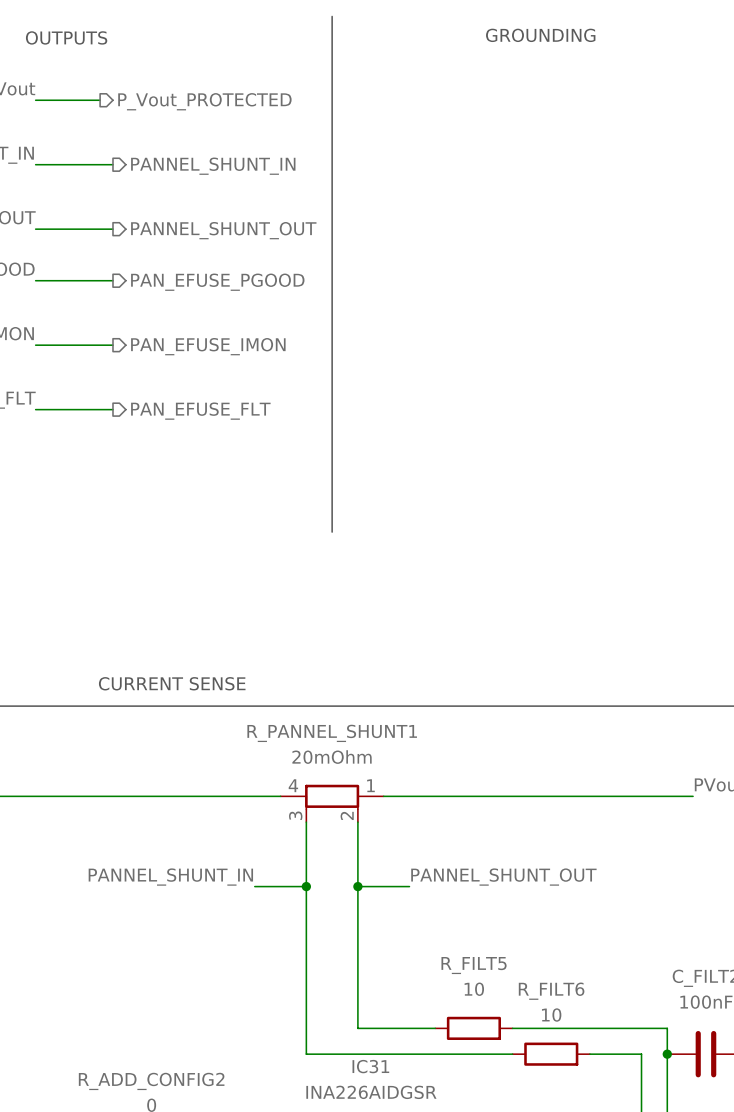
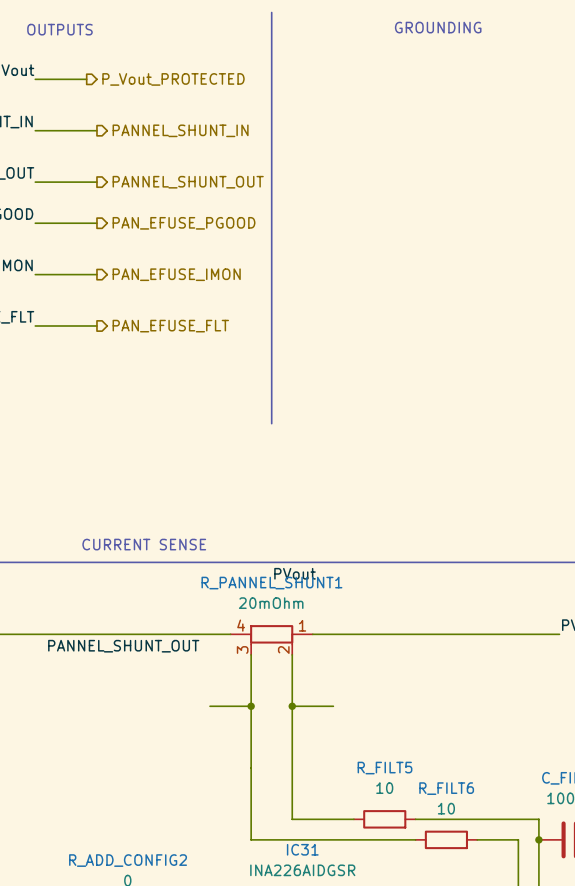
label: none -> PVout (295, 573)
label: none -> PANNEL_SHUNT_OUT (123, 646)
label: PANNEL_SHUNT_IN (170, 877) -> none
label: PANNEL_SHUNT_OUT (503, 877) -> none

